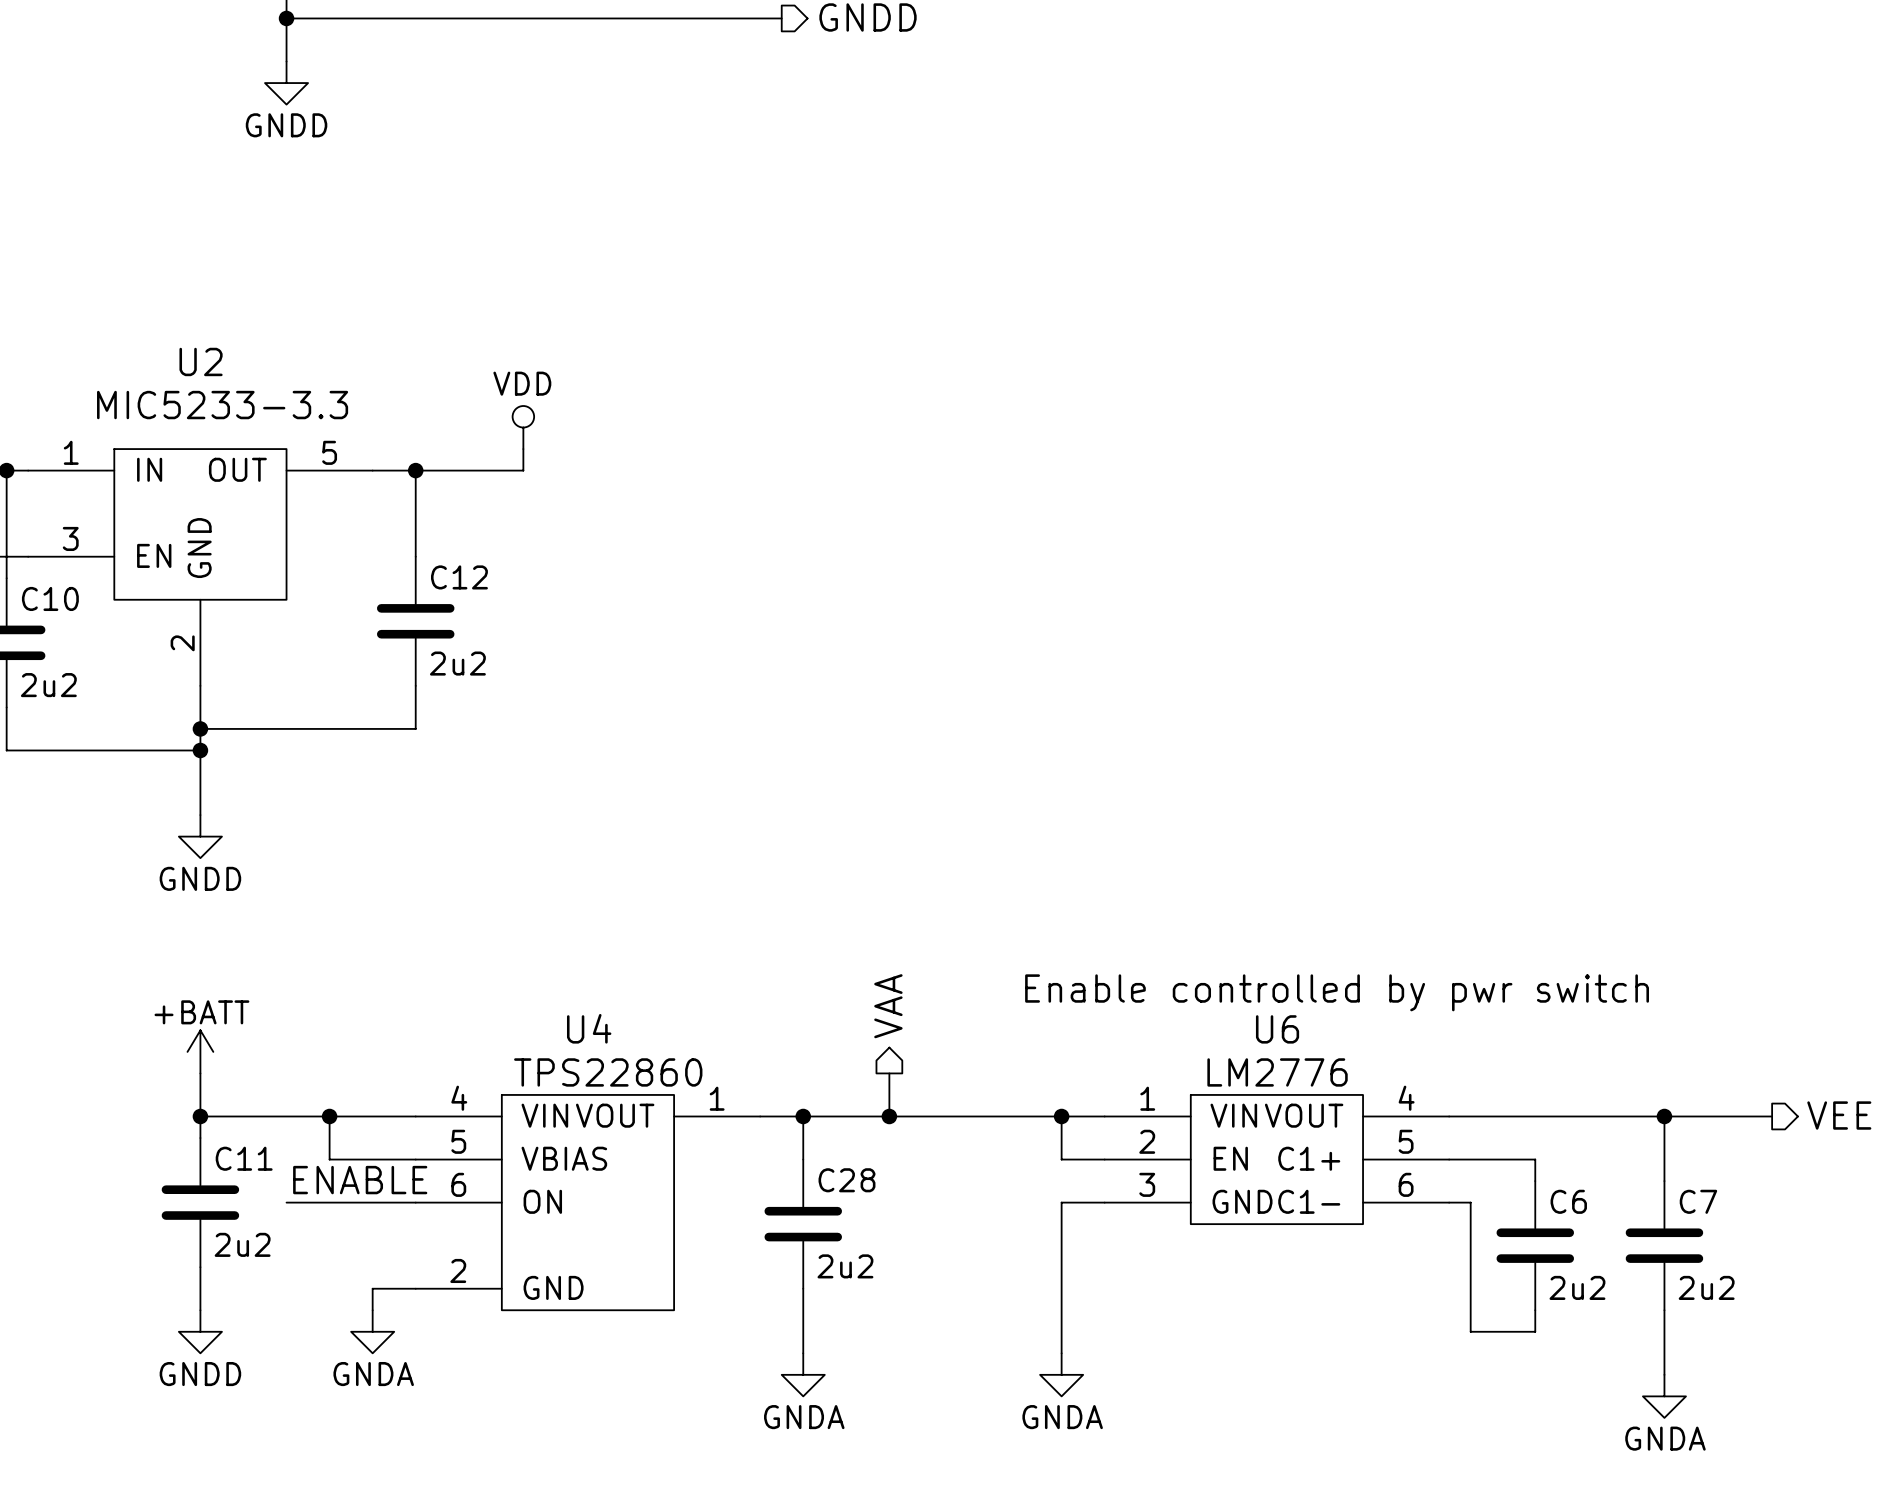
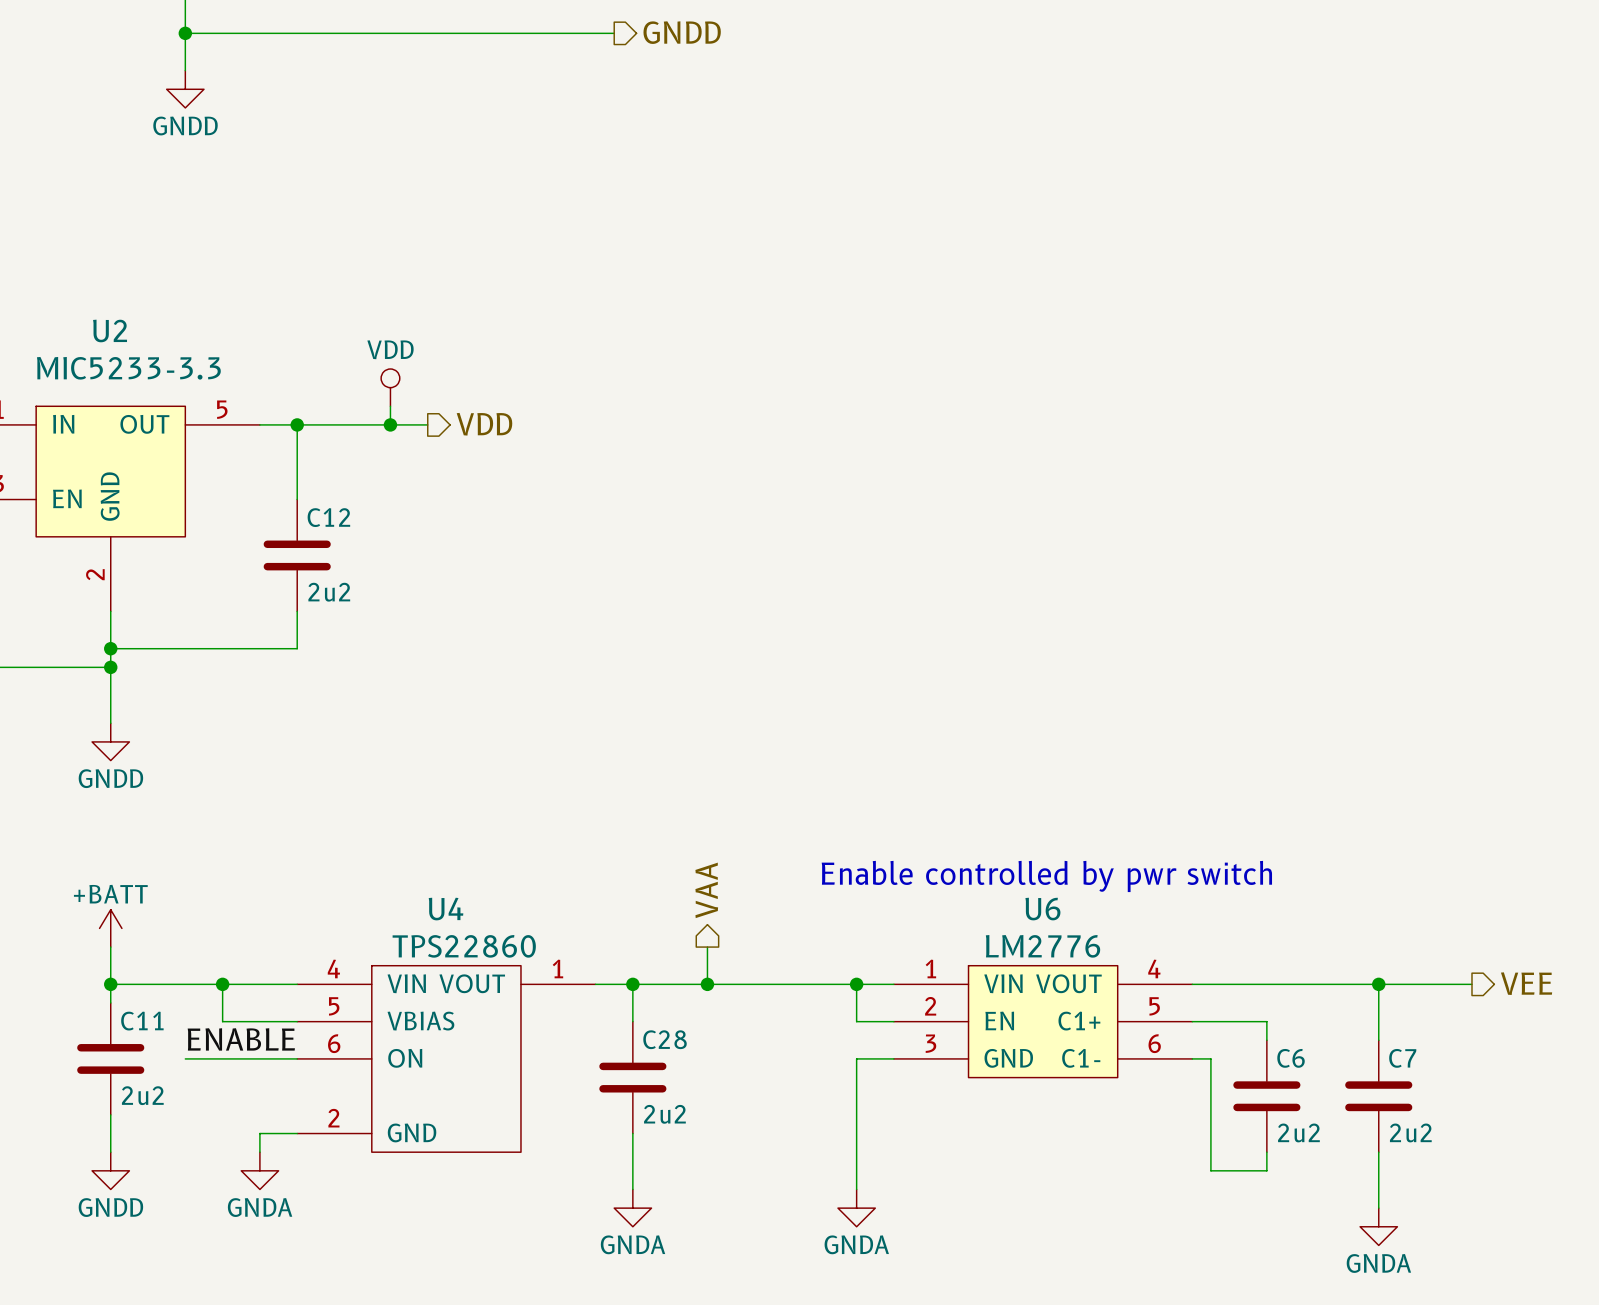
hierarchical label: none -> VDD (484, 424)
wire: none -> (390, 424) (427, 424)
junction: none -> (390, 424)

